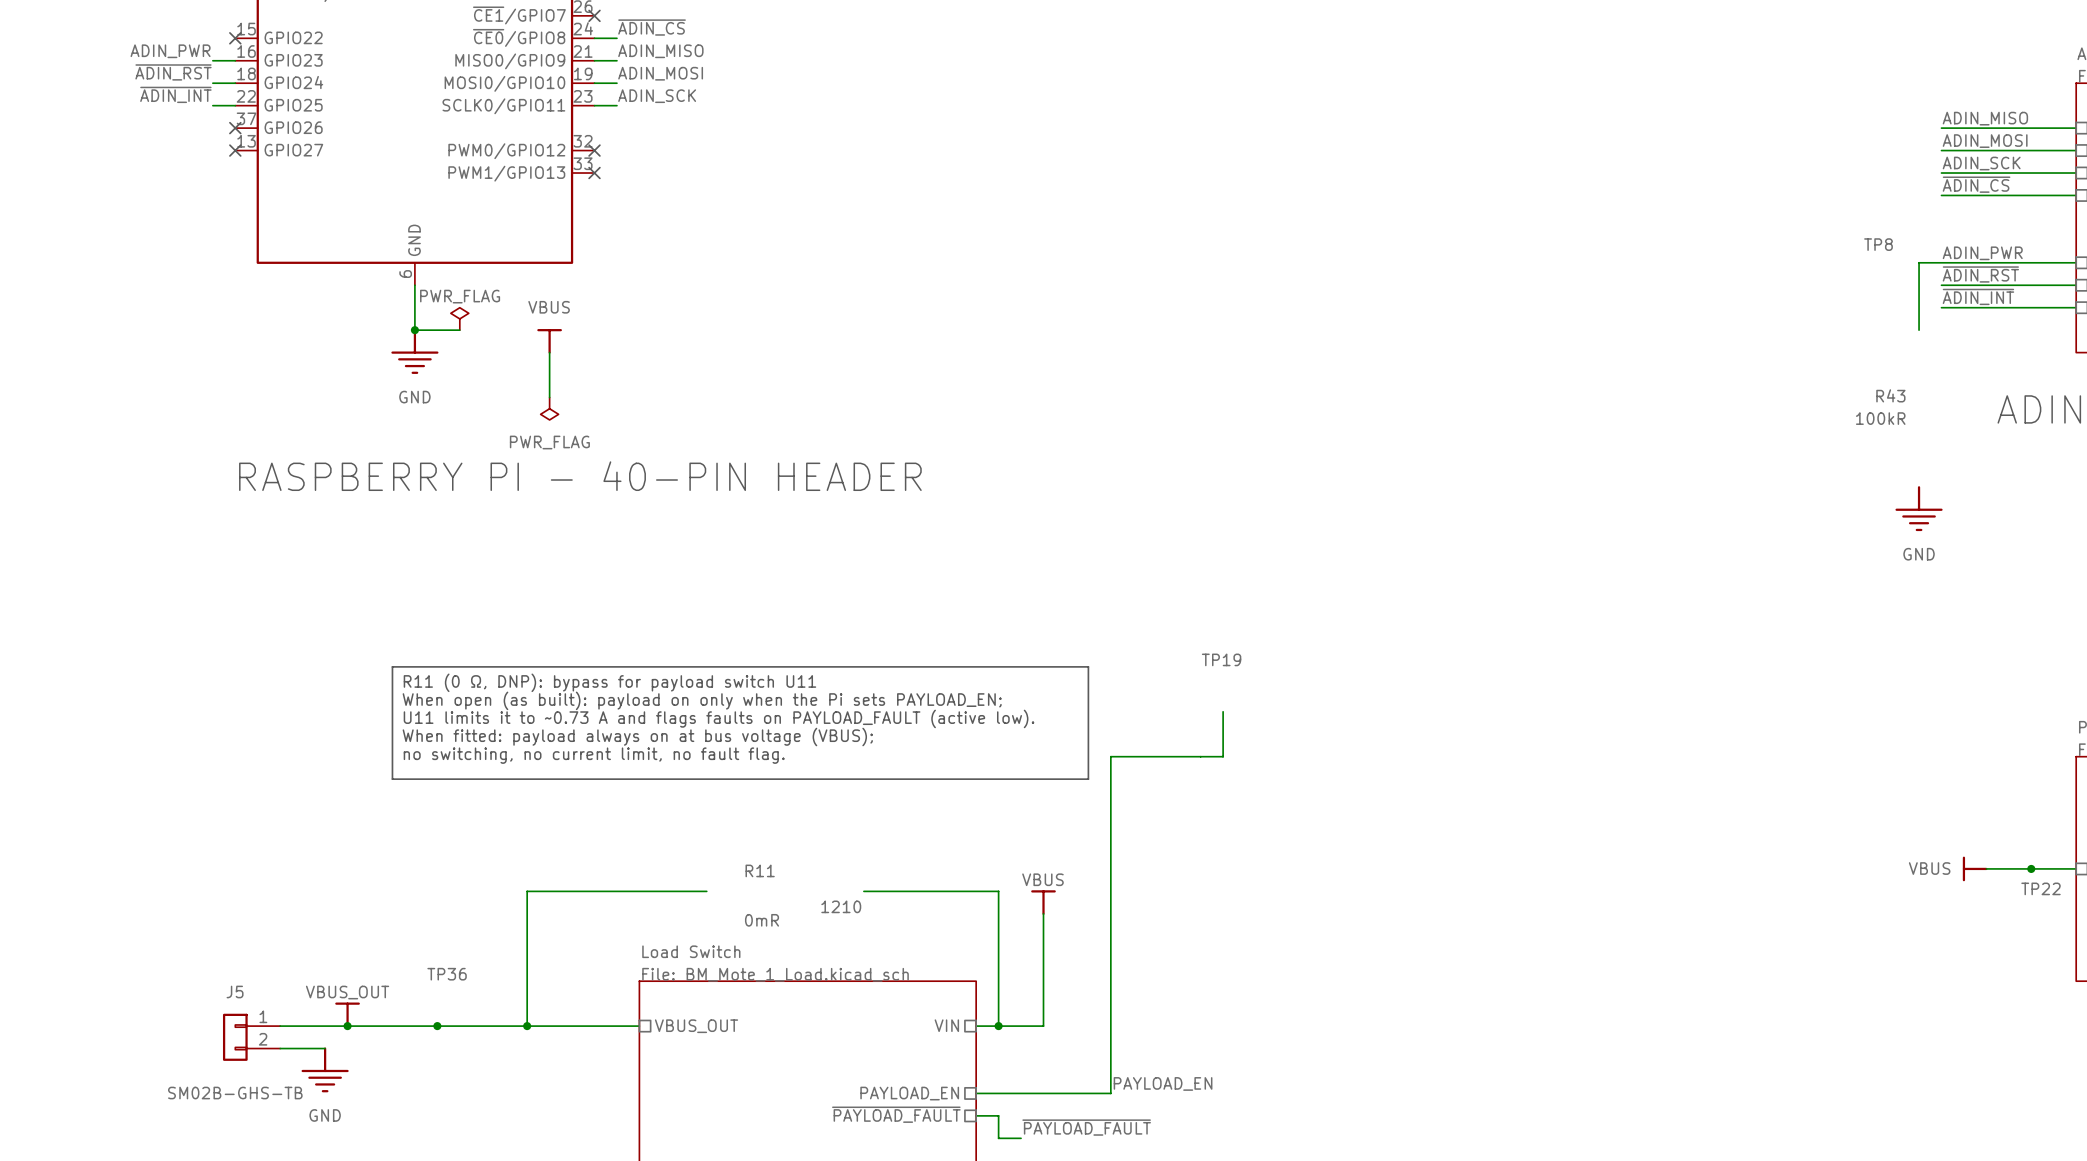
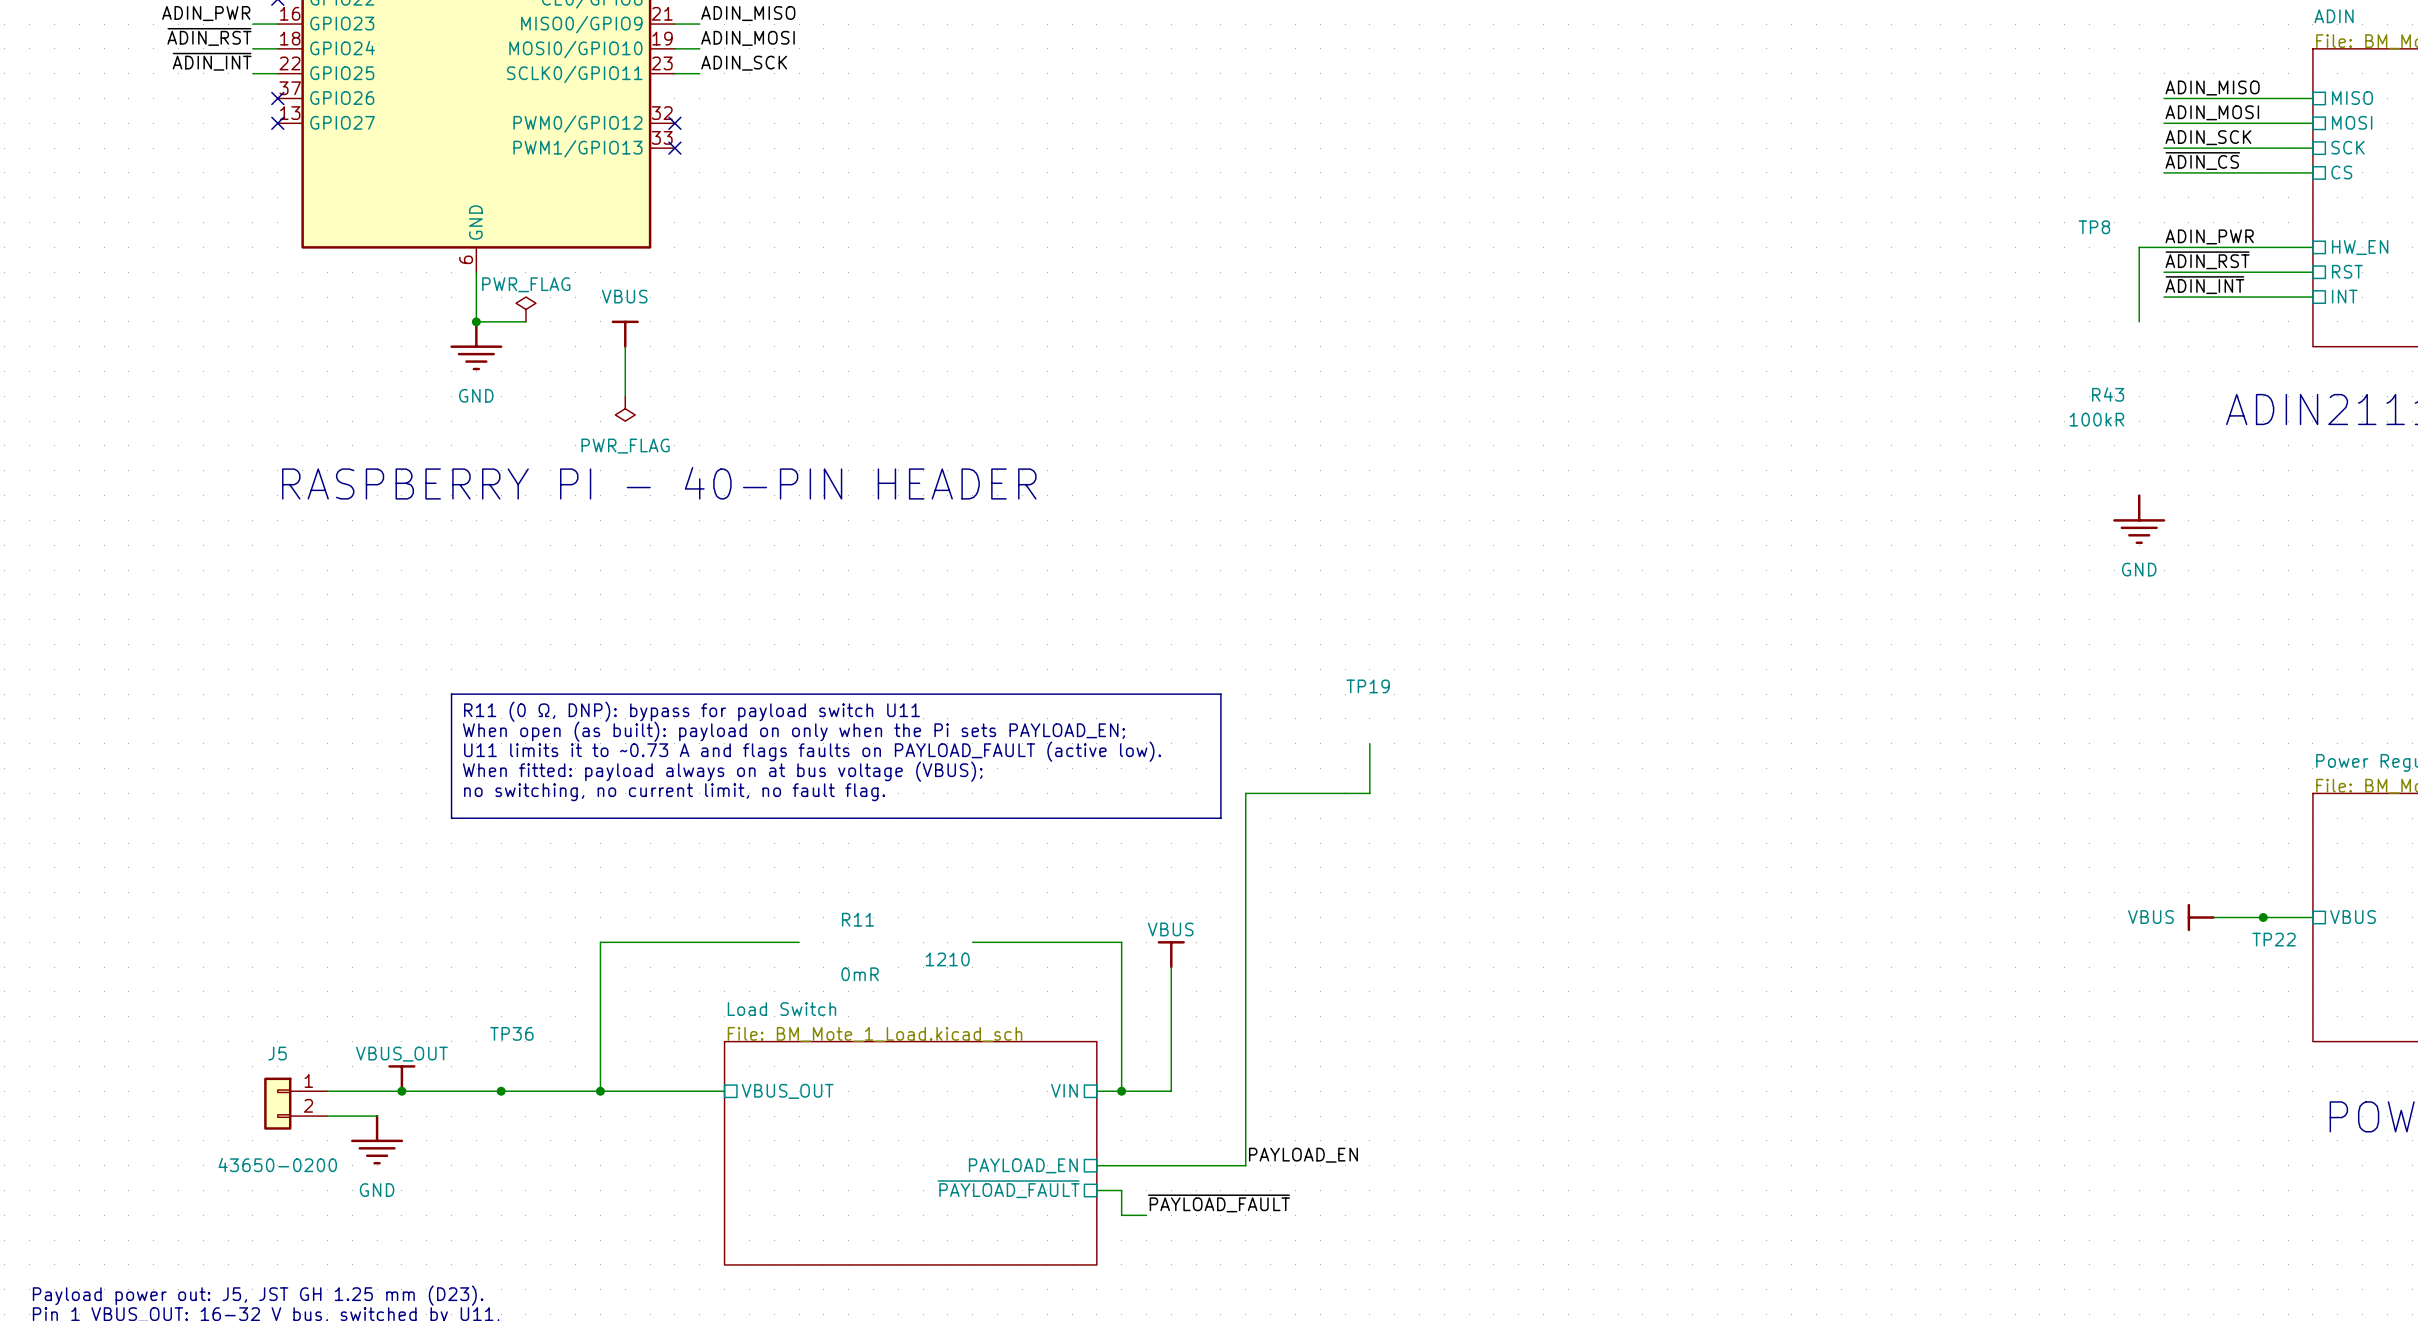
J5 value: SM02B-GHS-TB (235, 1093) -> 43650-0200 (277, 1164)

